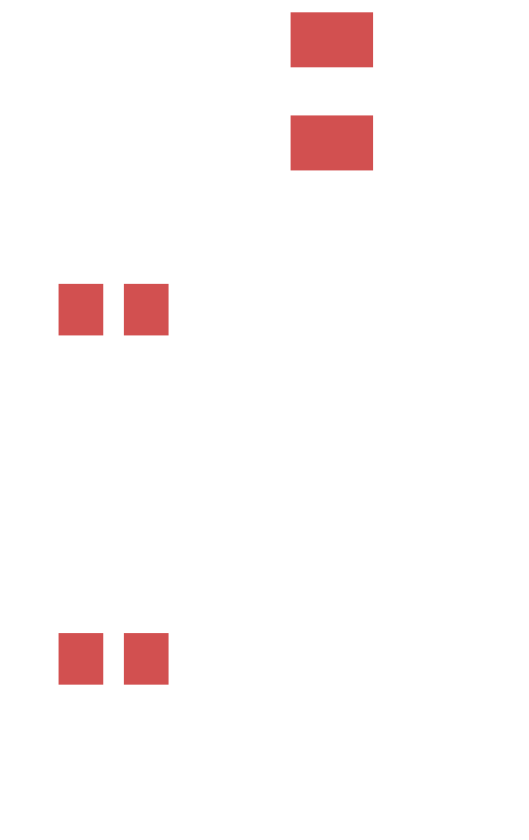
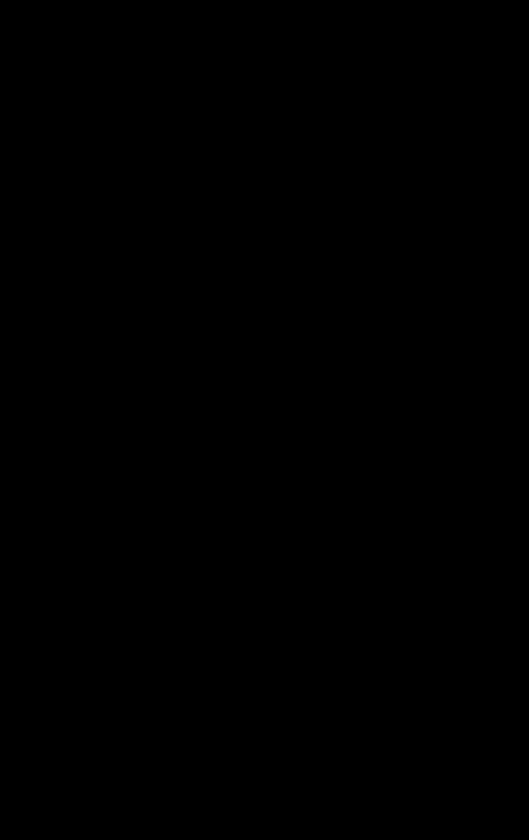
part: (331, 91) -> none
part: (113, 309) -> none
part: (113, 658) -> none

